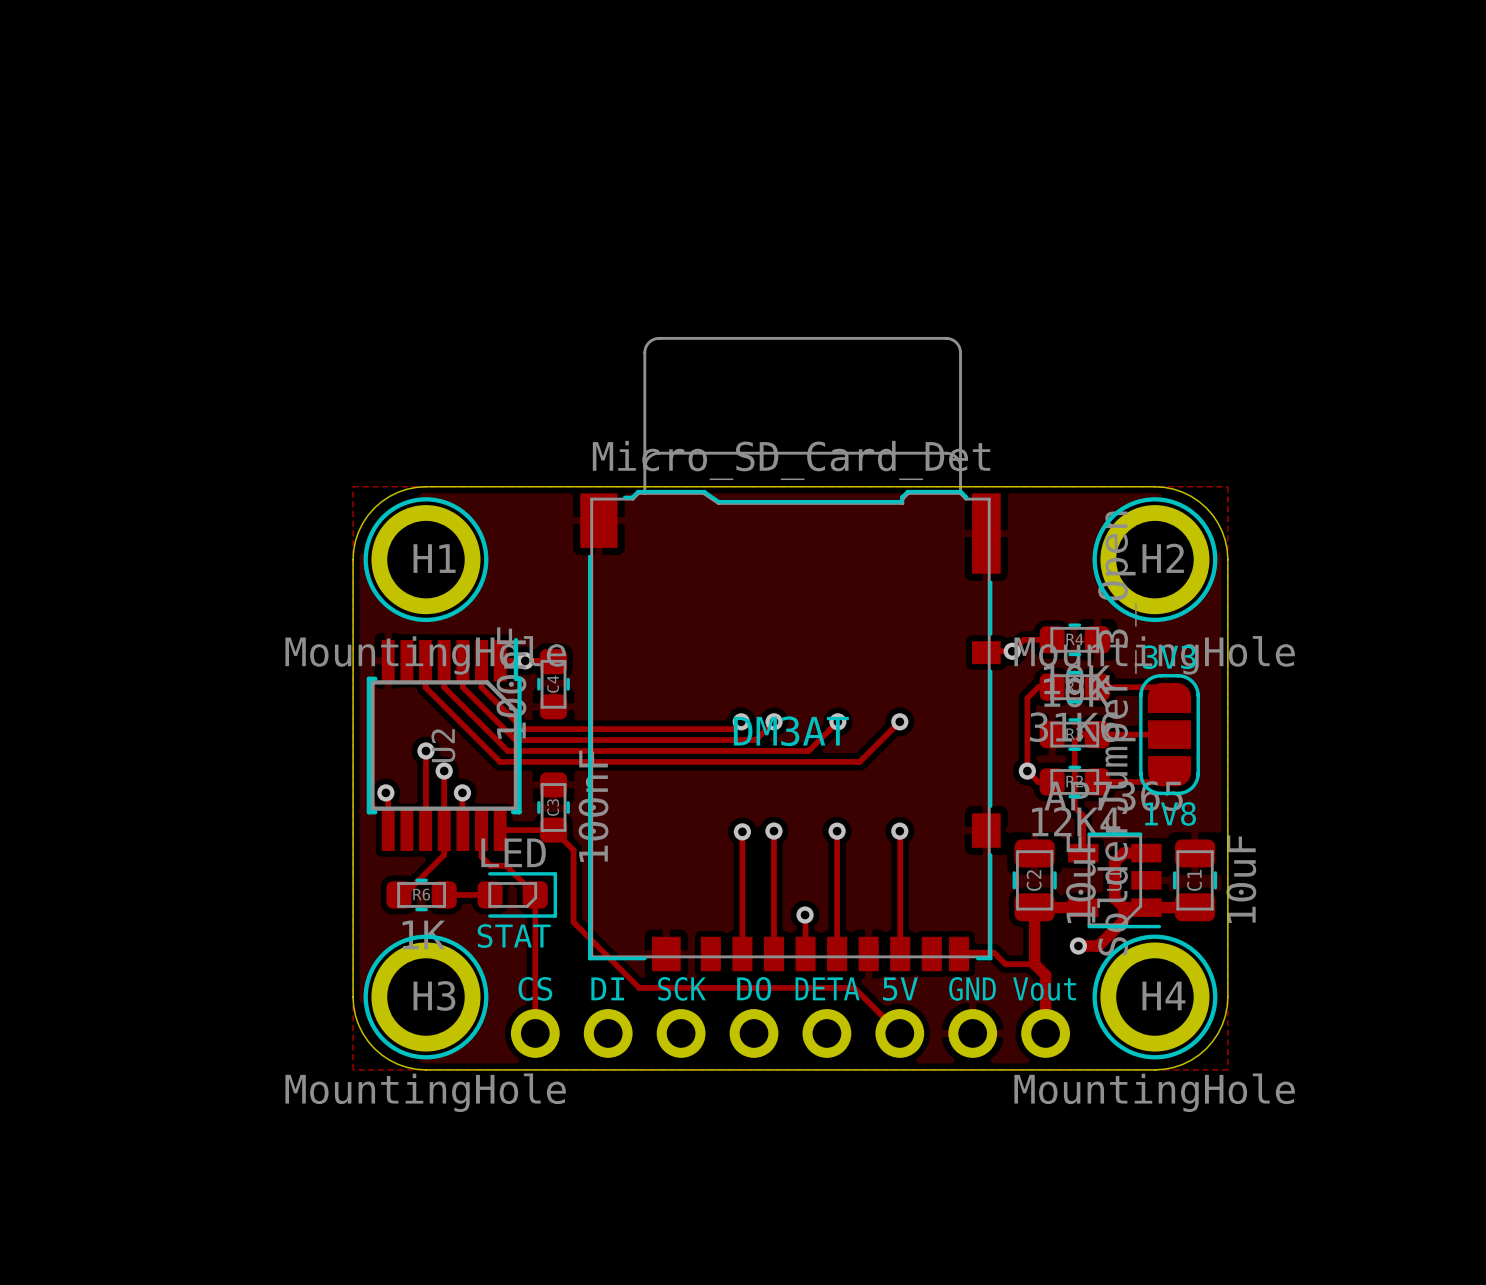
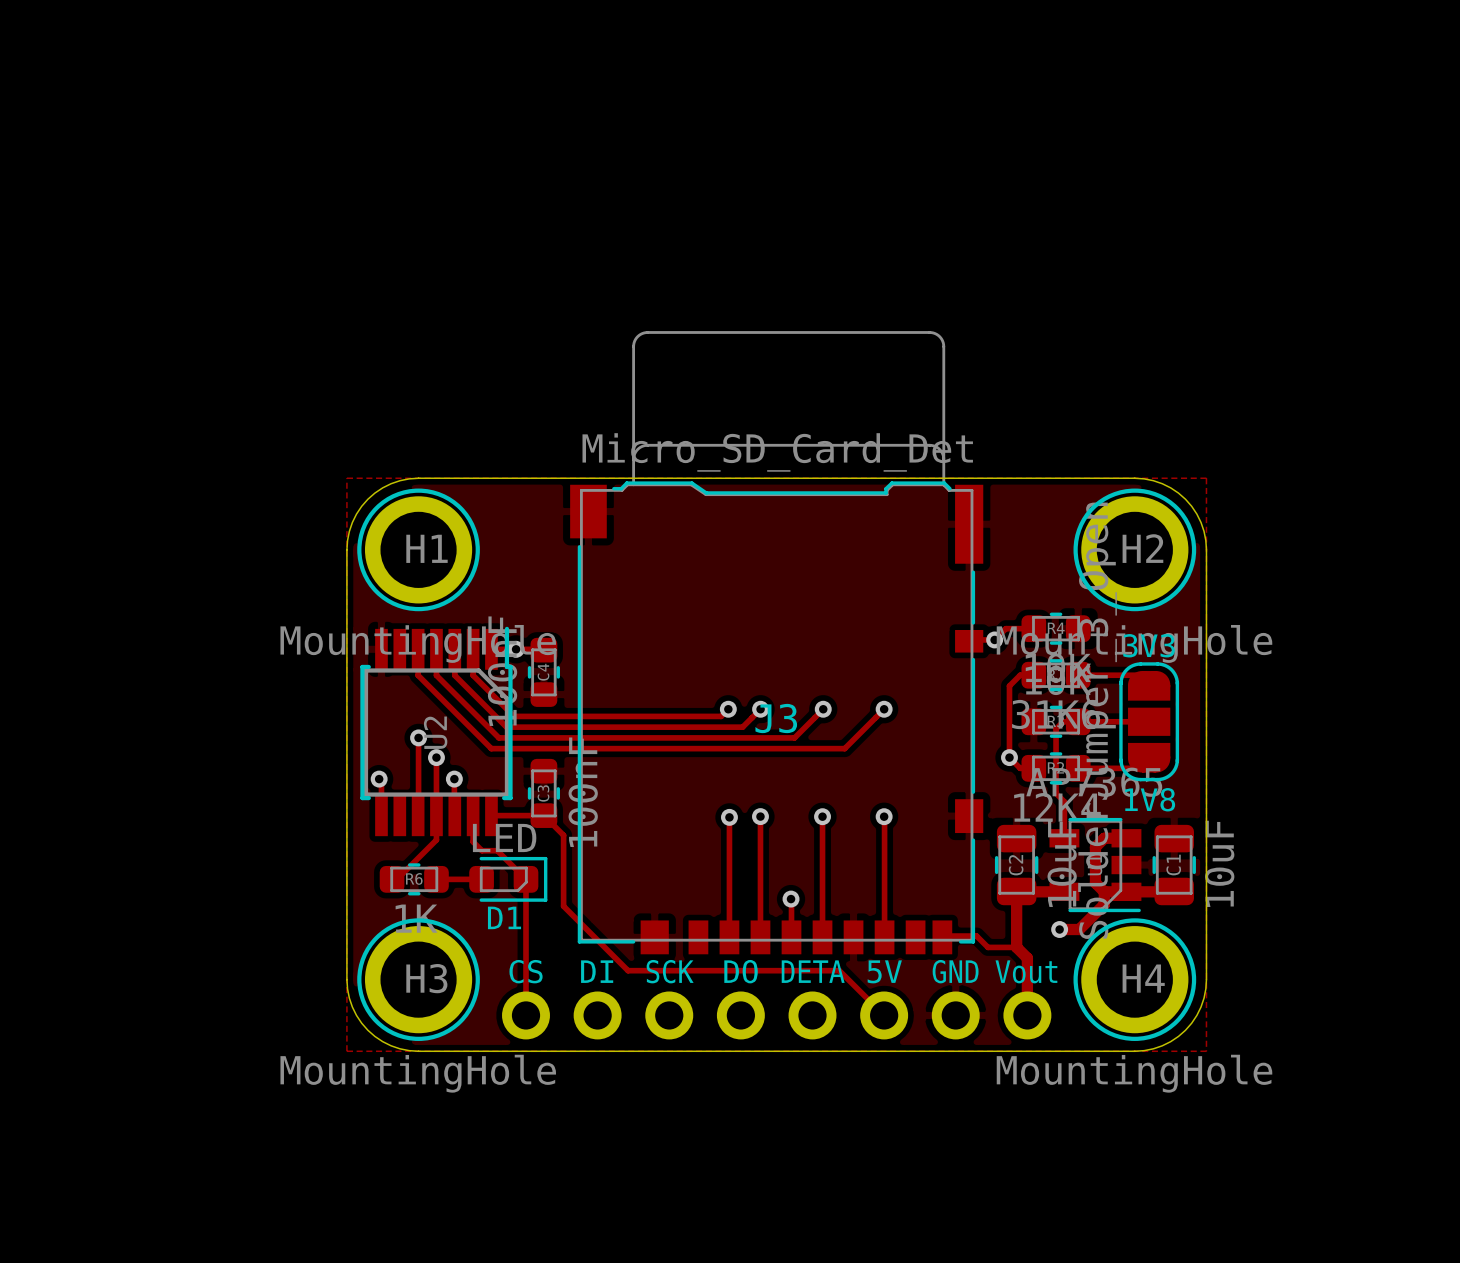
DM3AT name: DM3AT (791, 731) -> J3 (776, 718)
STAT name: STAT (514, 936) -> D1 (504, 917)

